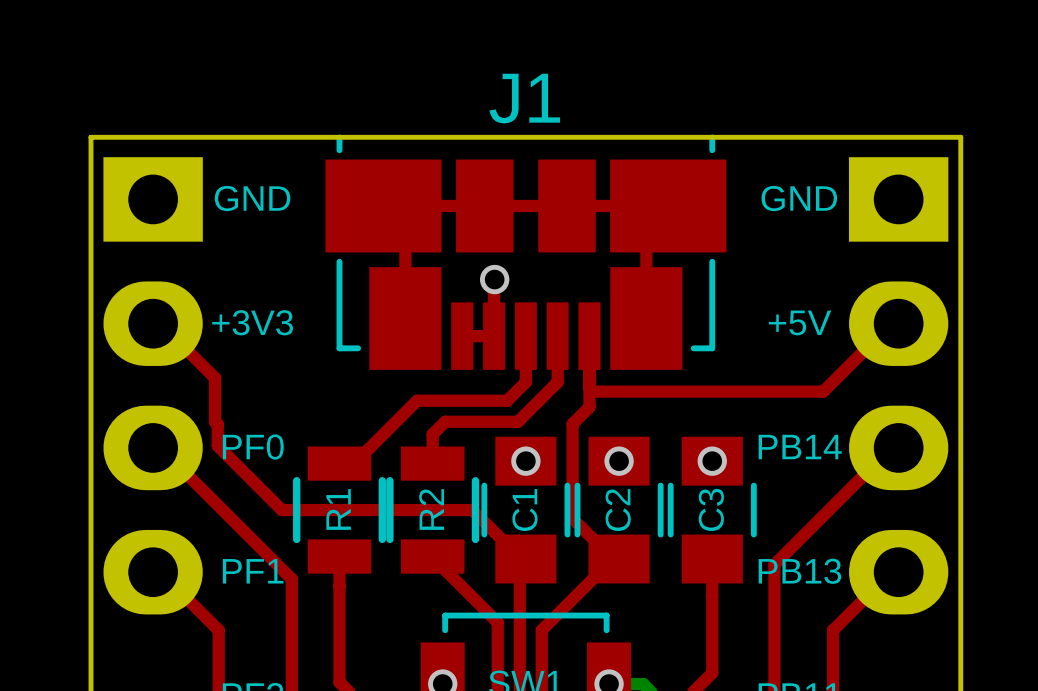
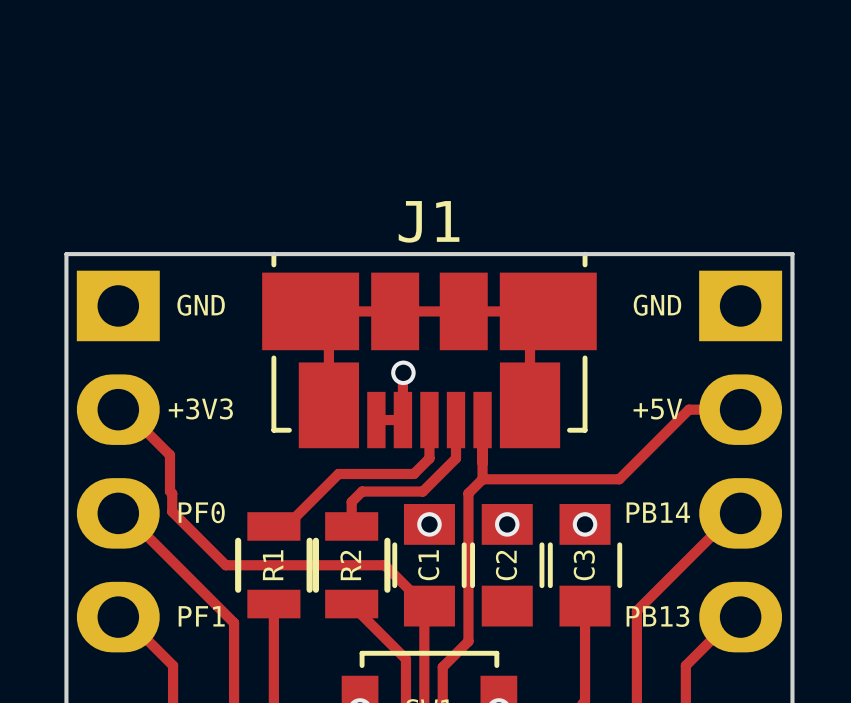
top track: (891, 323) (823, 391) (593, 391) (589, 387) -> (734, 409) (688, 409) (619, 479) (482, 479)
top track: (572, 518) (612, 558) (541, 632) -> (468, 572) (468, 641) (442, 667)

